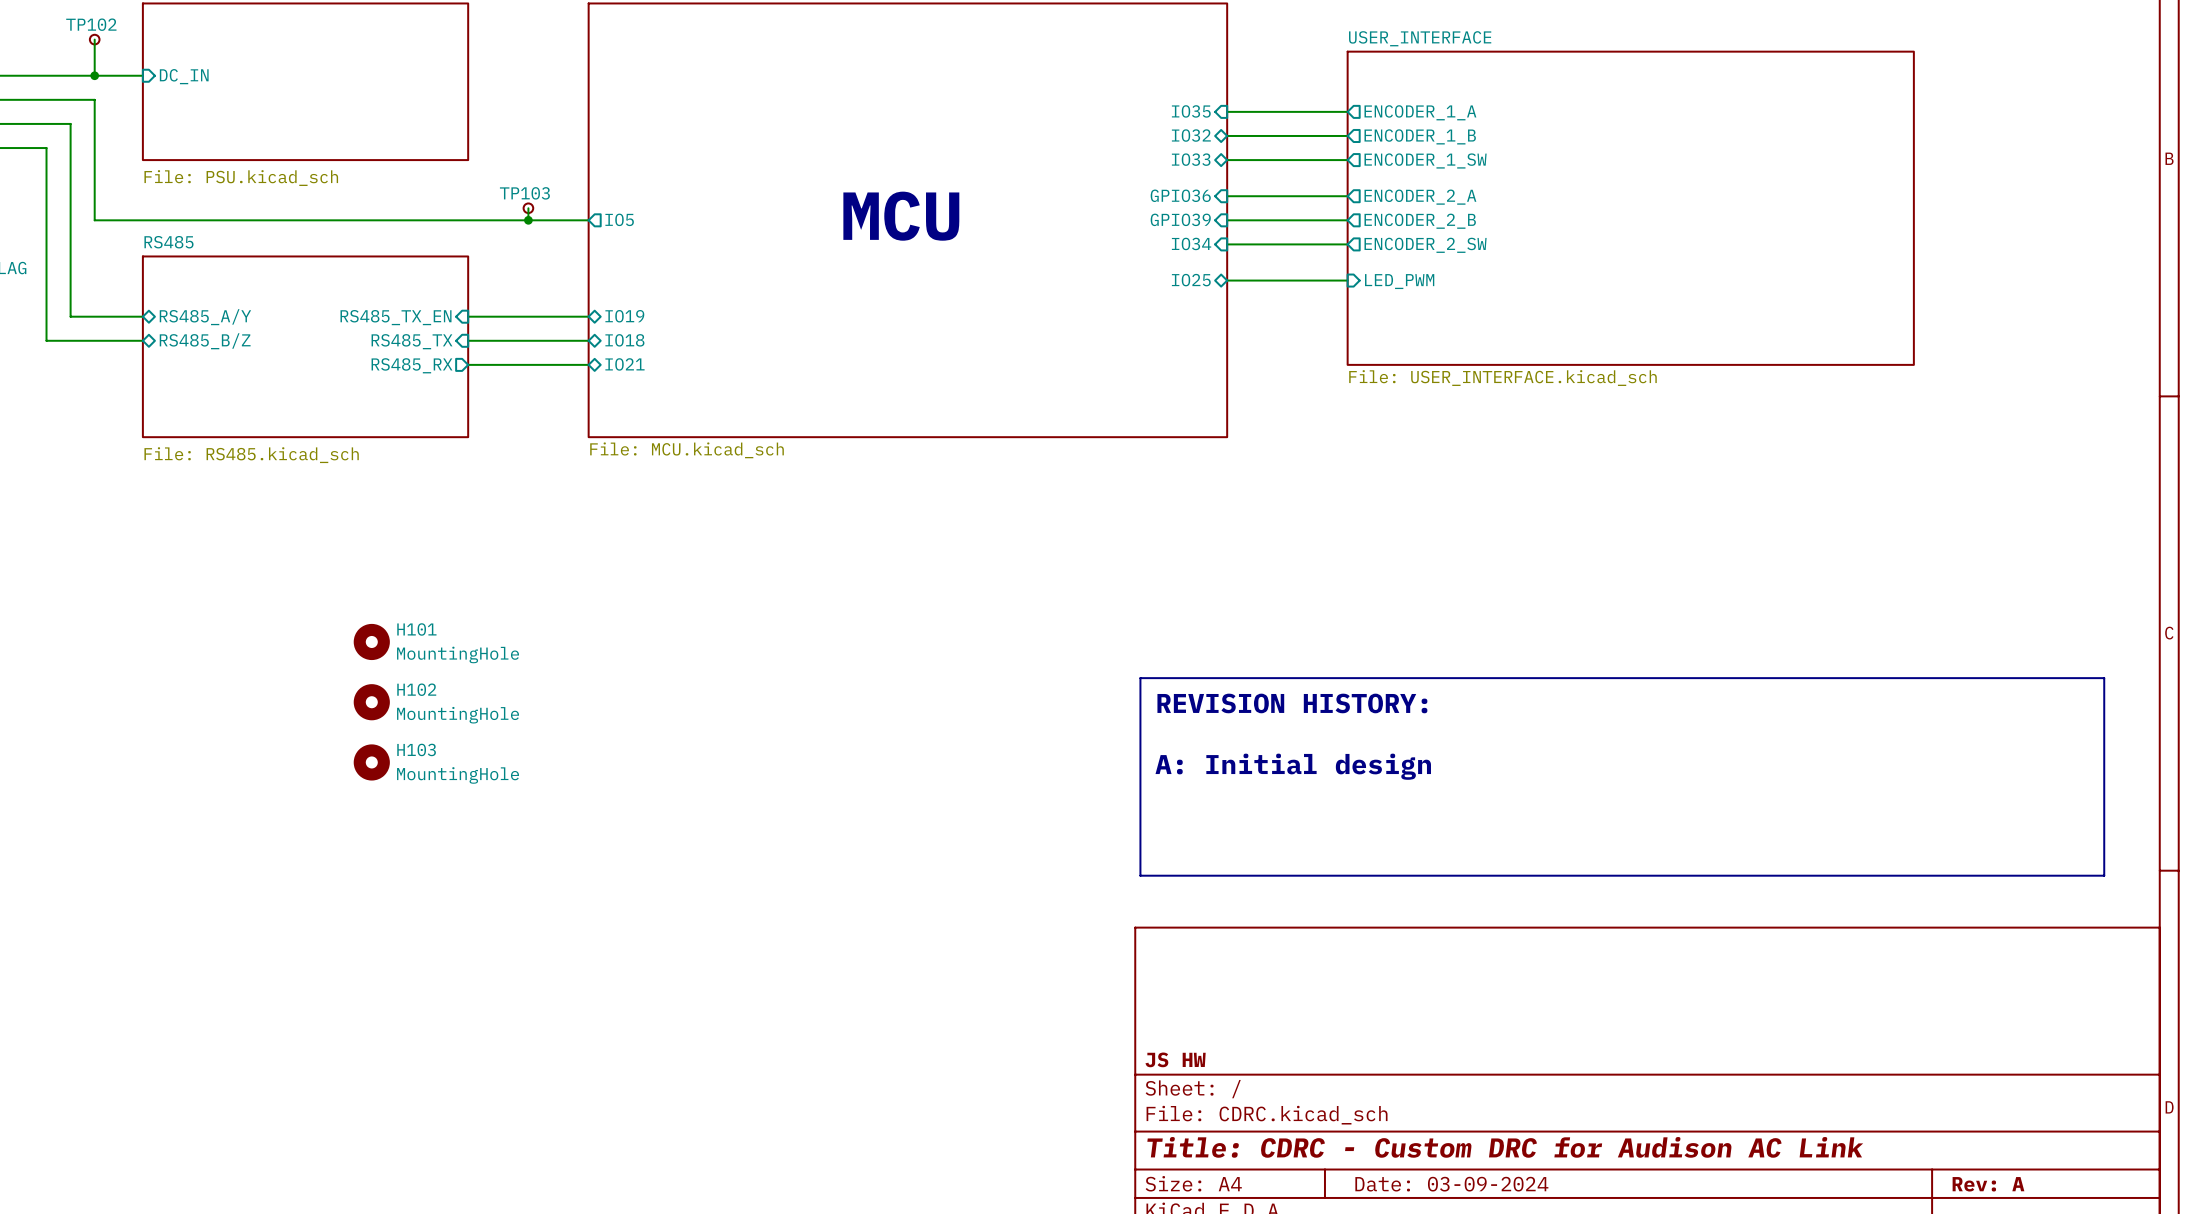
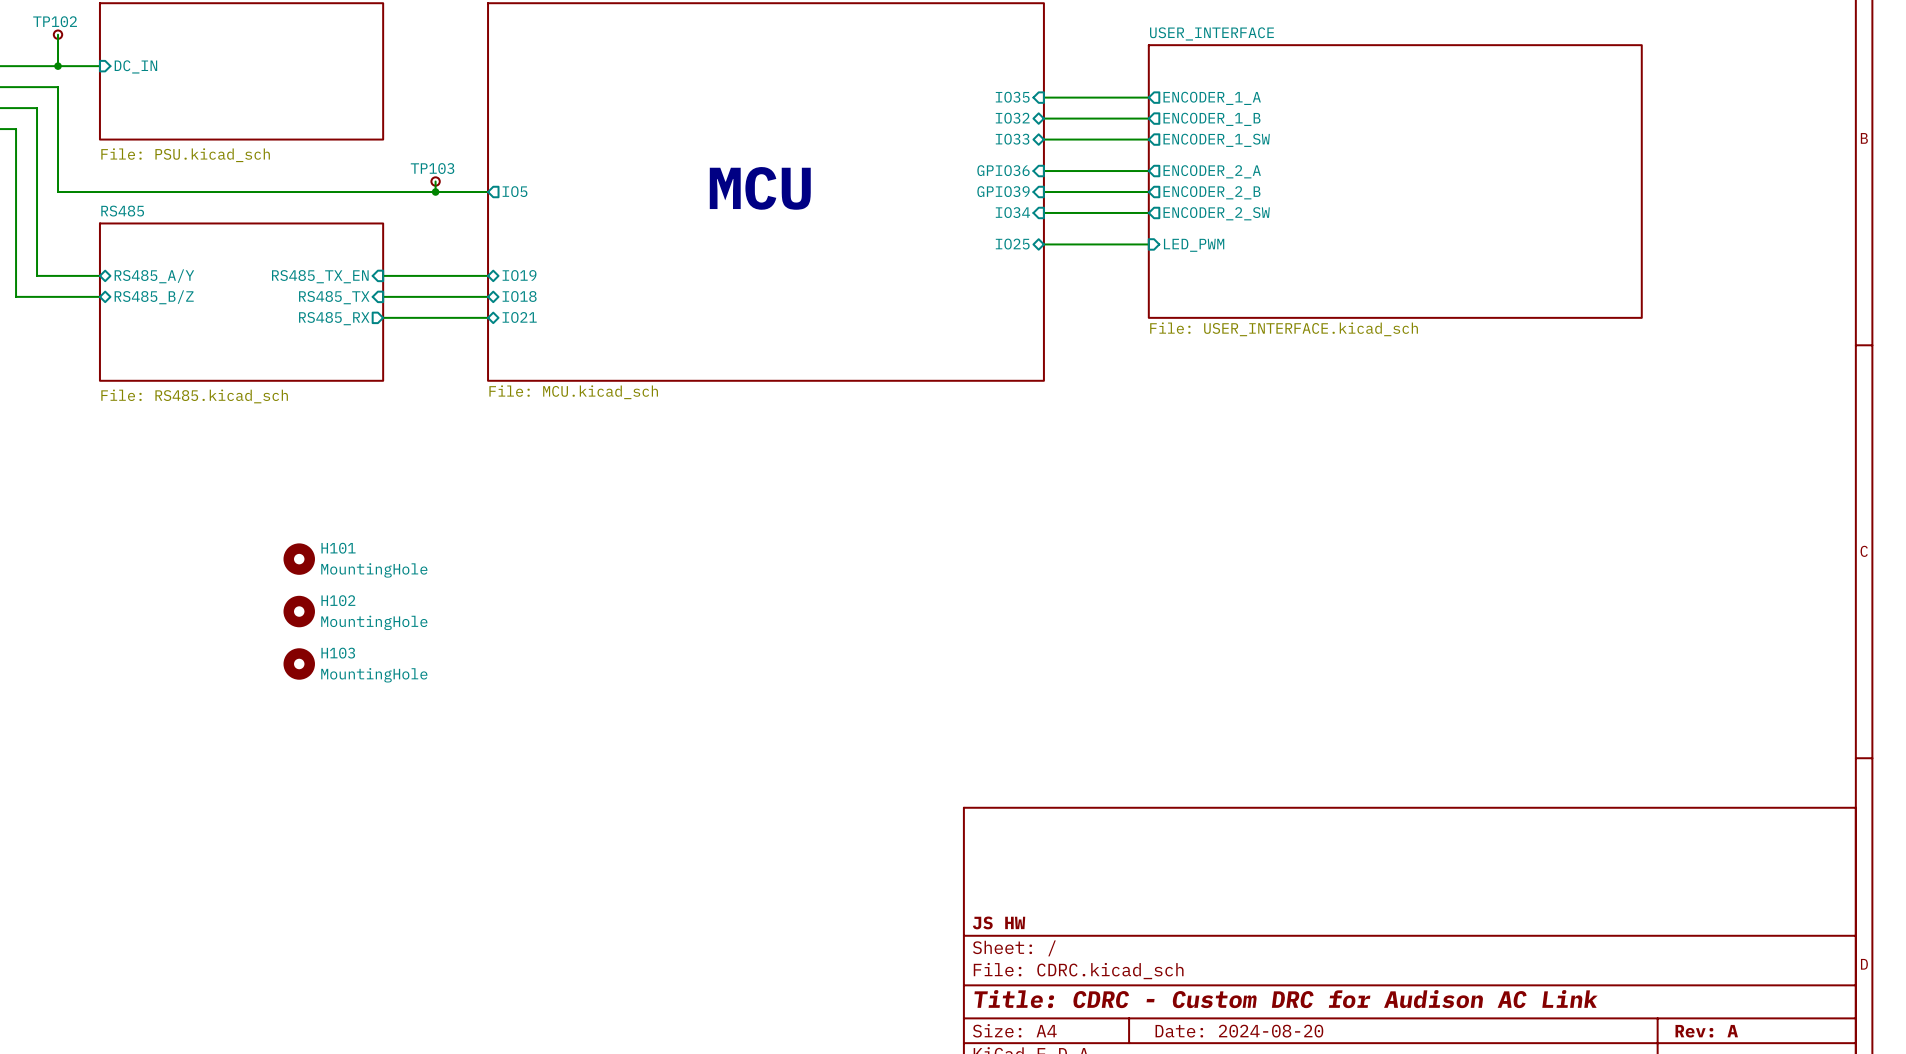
line: (1140, 678) (2104, 678) (2104, 875) (1140, 875) (1140, 678) -> none
text: REVISION HISTORY: (1292, 703) -> none
text: A: Initial design (1293, 766) -> none
title block: Date: 03-09-2024 (1451, 1184) -> Date: 2024-08-20 (1239, 1031)

